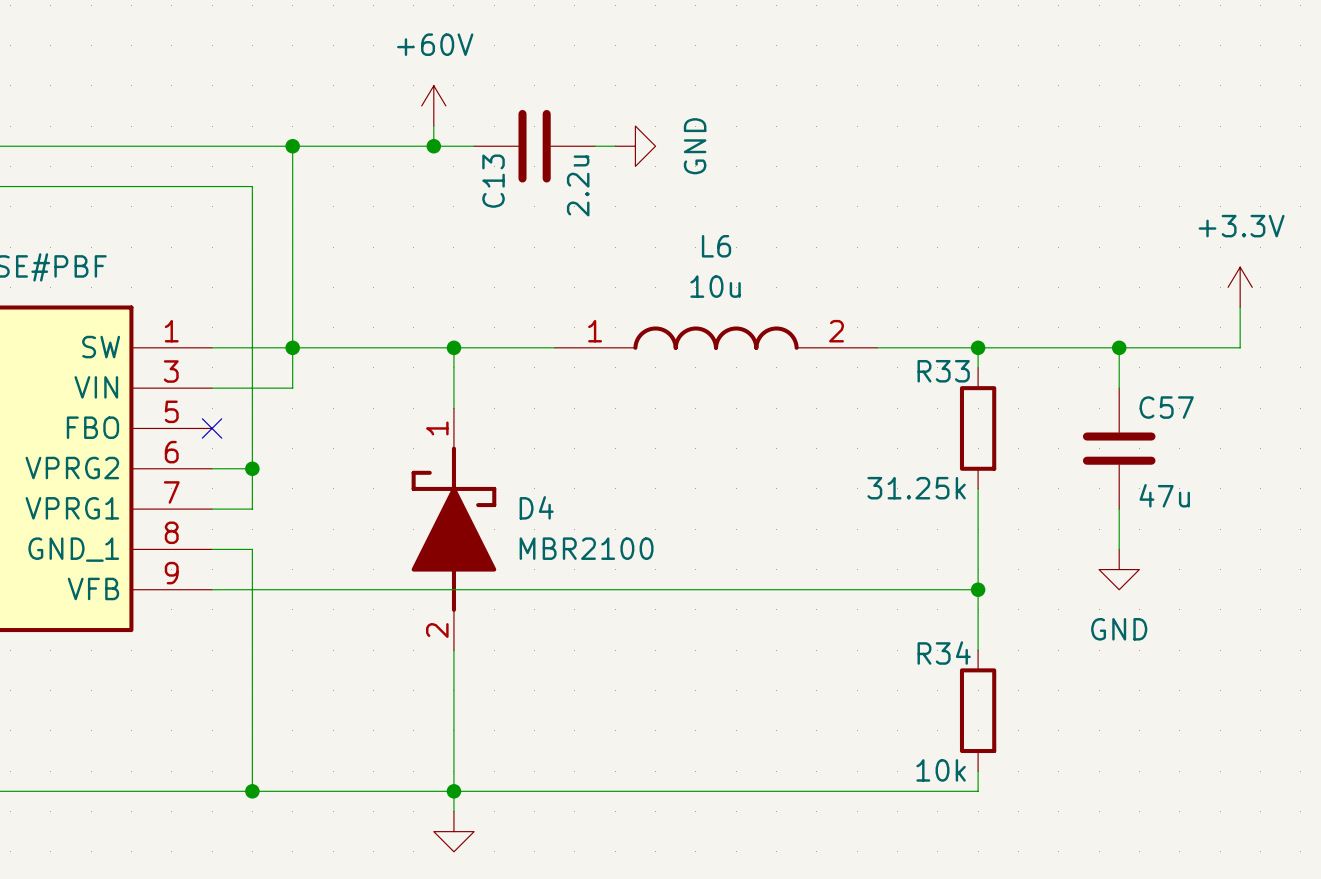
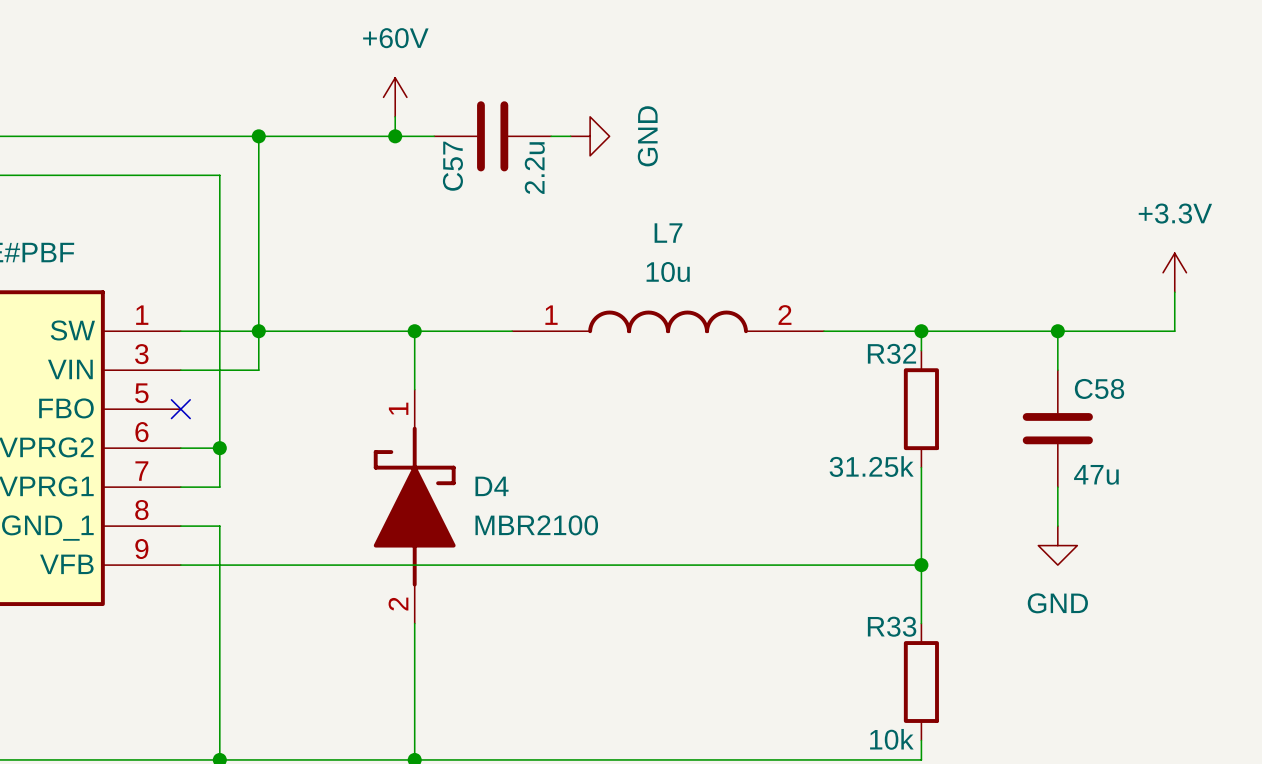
C13 name: C13 (493, 181) -> C57 (452, 166)
L6 name: L6 (716, 246) -> L7 (668, 233)
R33 name: R33 (943, 371) -> R32 (891, 353)
C57 name: C57 (1166, 407) -> C58 (1099, 388)
R34 name: R34 (944, 653) -> R33 (892, 626)

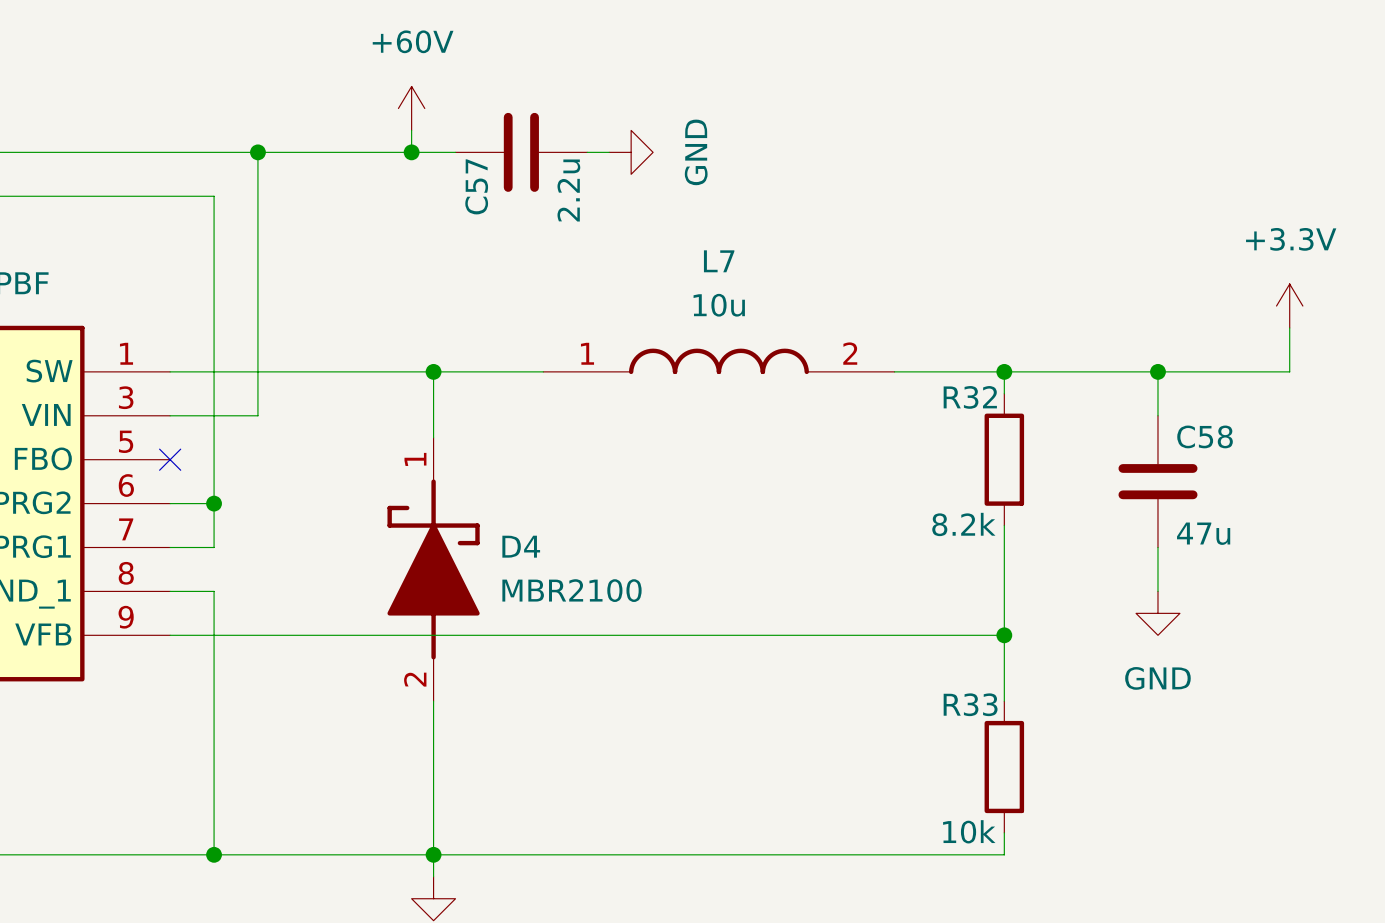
junction: (258, 331) -> none
R32 value: 31.25k (871, 466) -> 8.2k (963, 524)

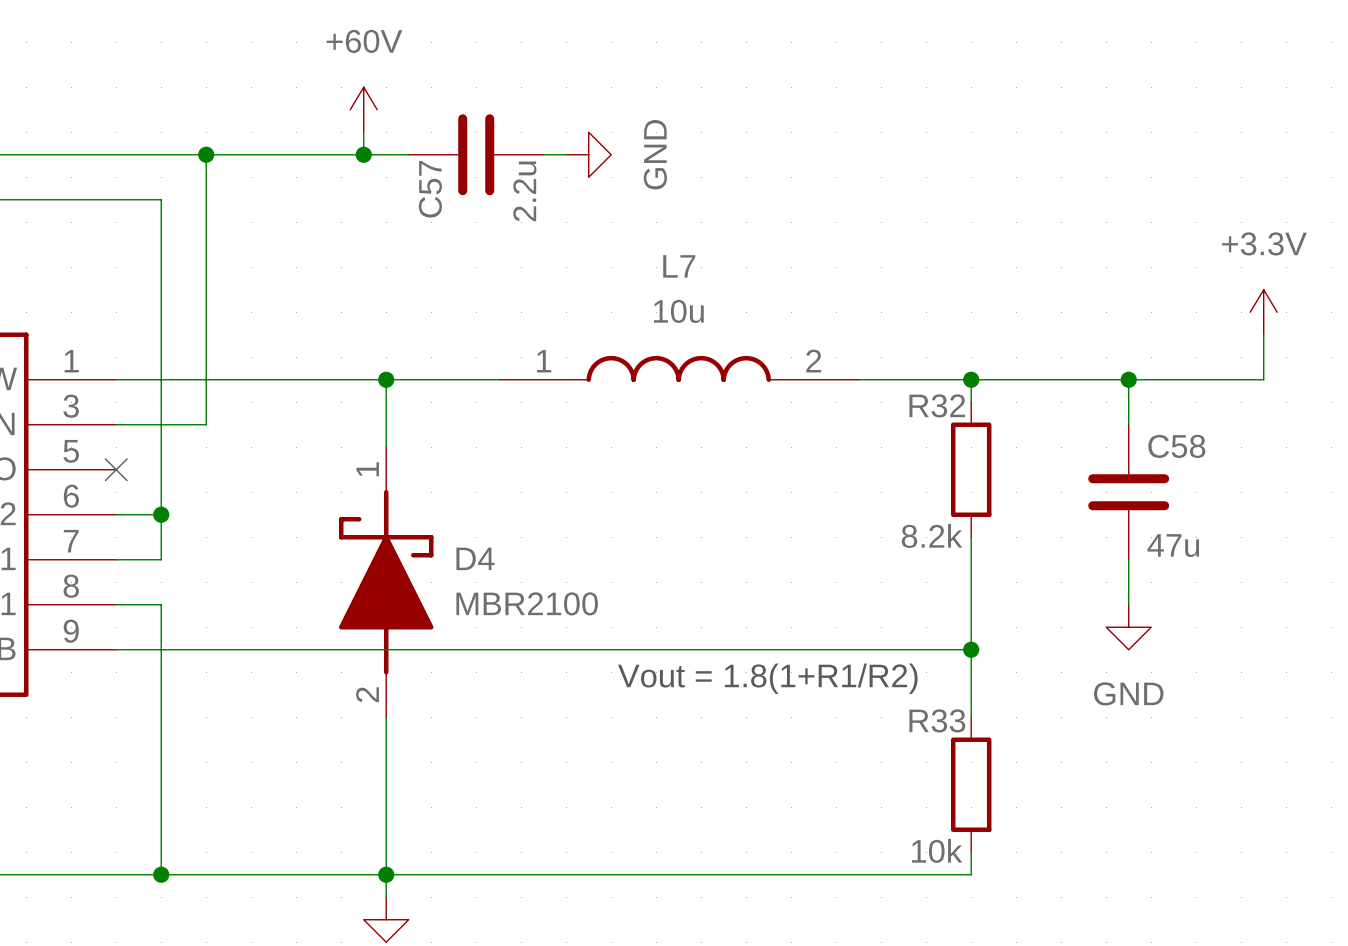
text: none -> Vout = 1.8(1+R1/R2) (767, 678)

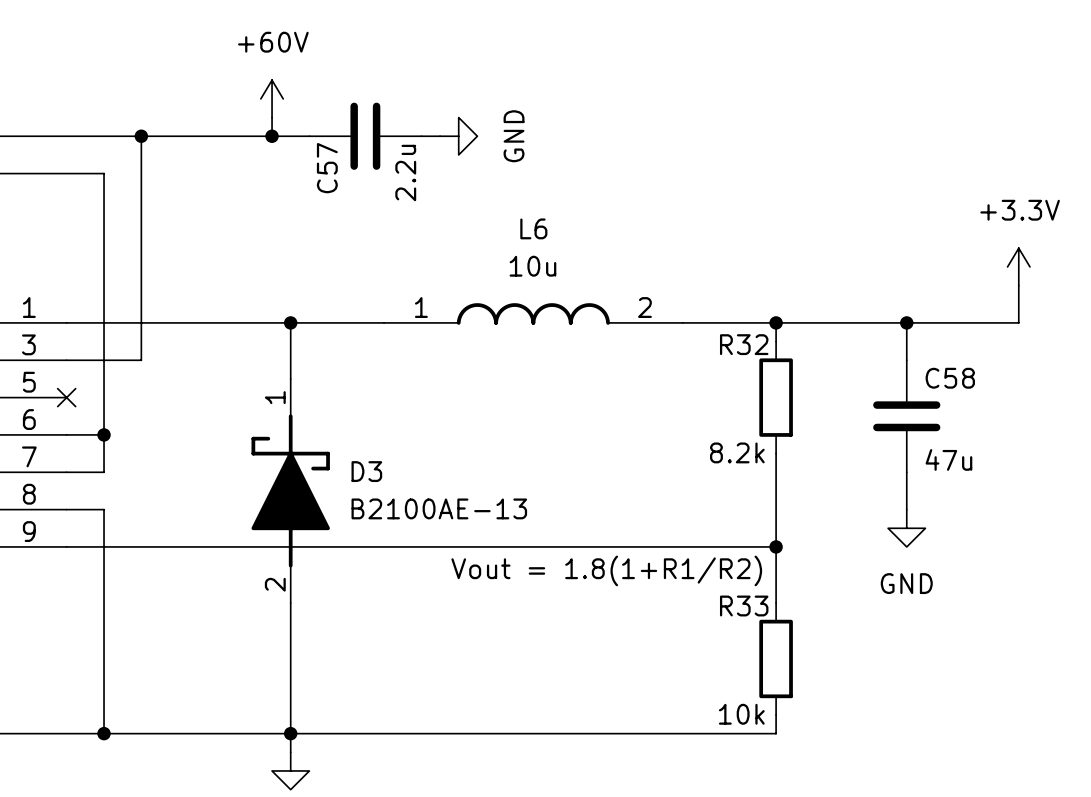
L7 name: L7 (679, 266) -> L6 (533, 228)
D4 name: D4 (475, 558) -> D3 (366, 471)
D4 value: MBR2100 (527, 603) -> B2100AE-13 (439, 508)

